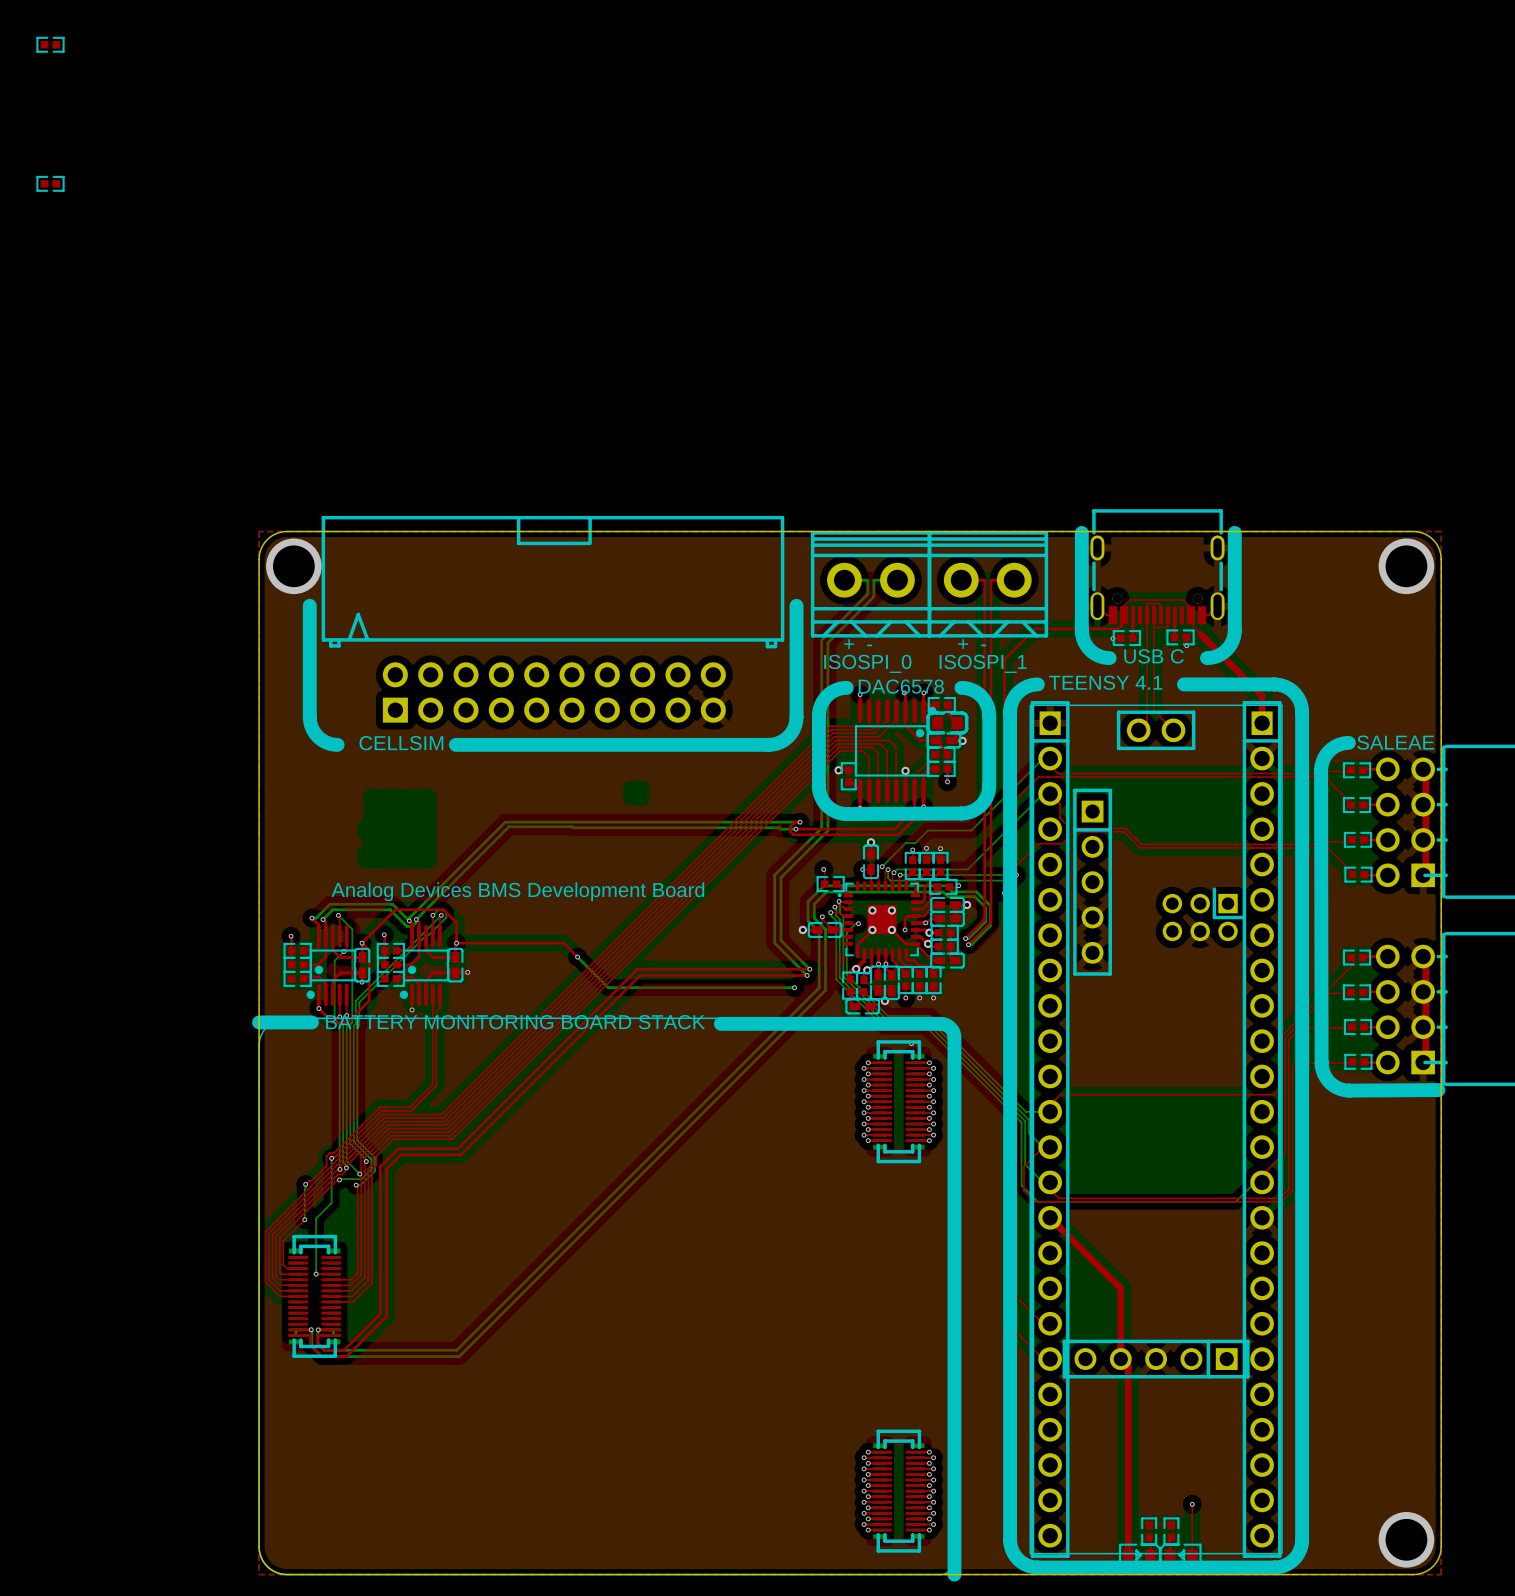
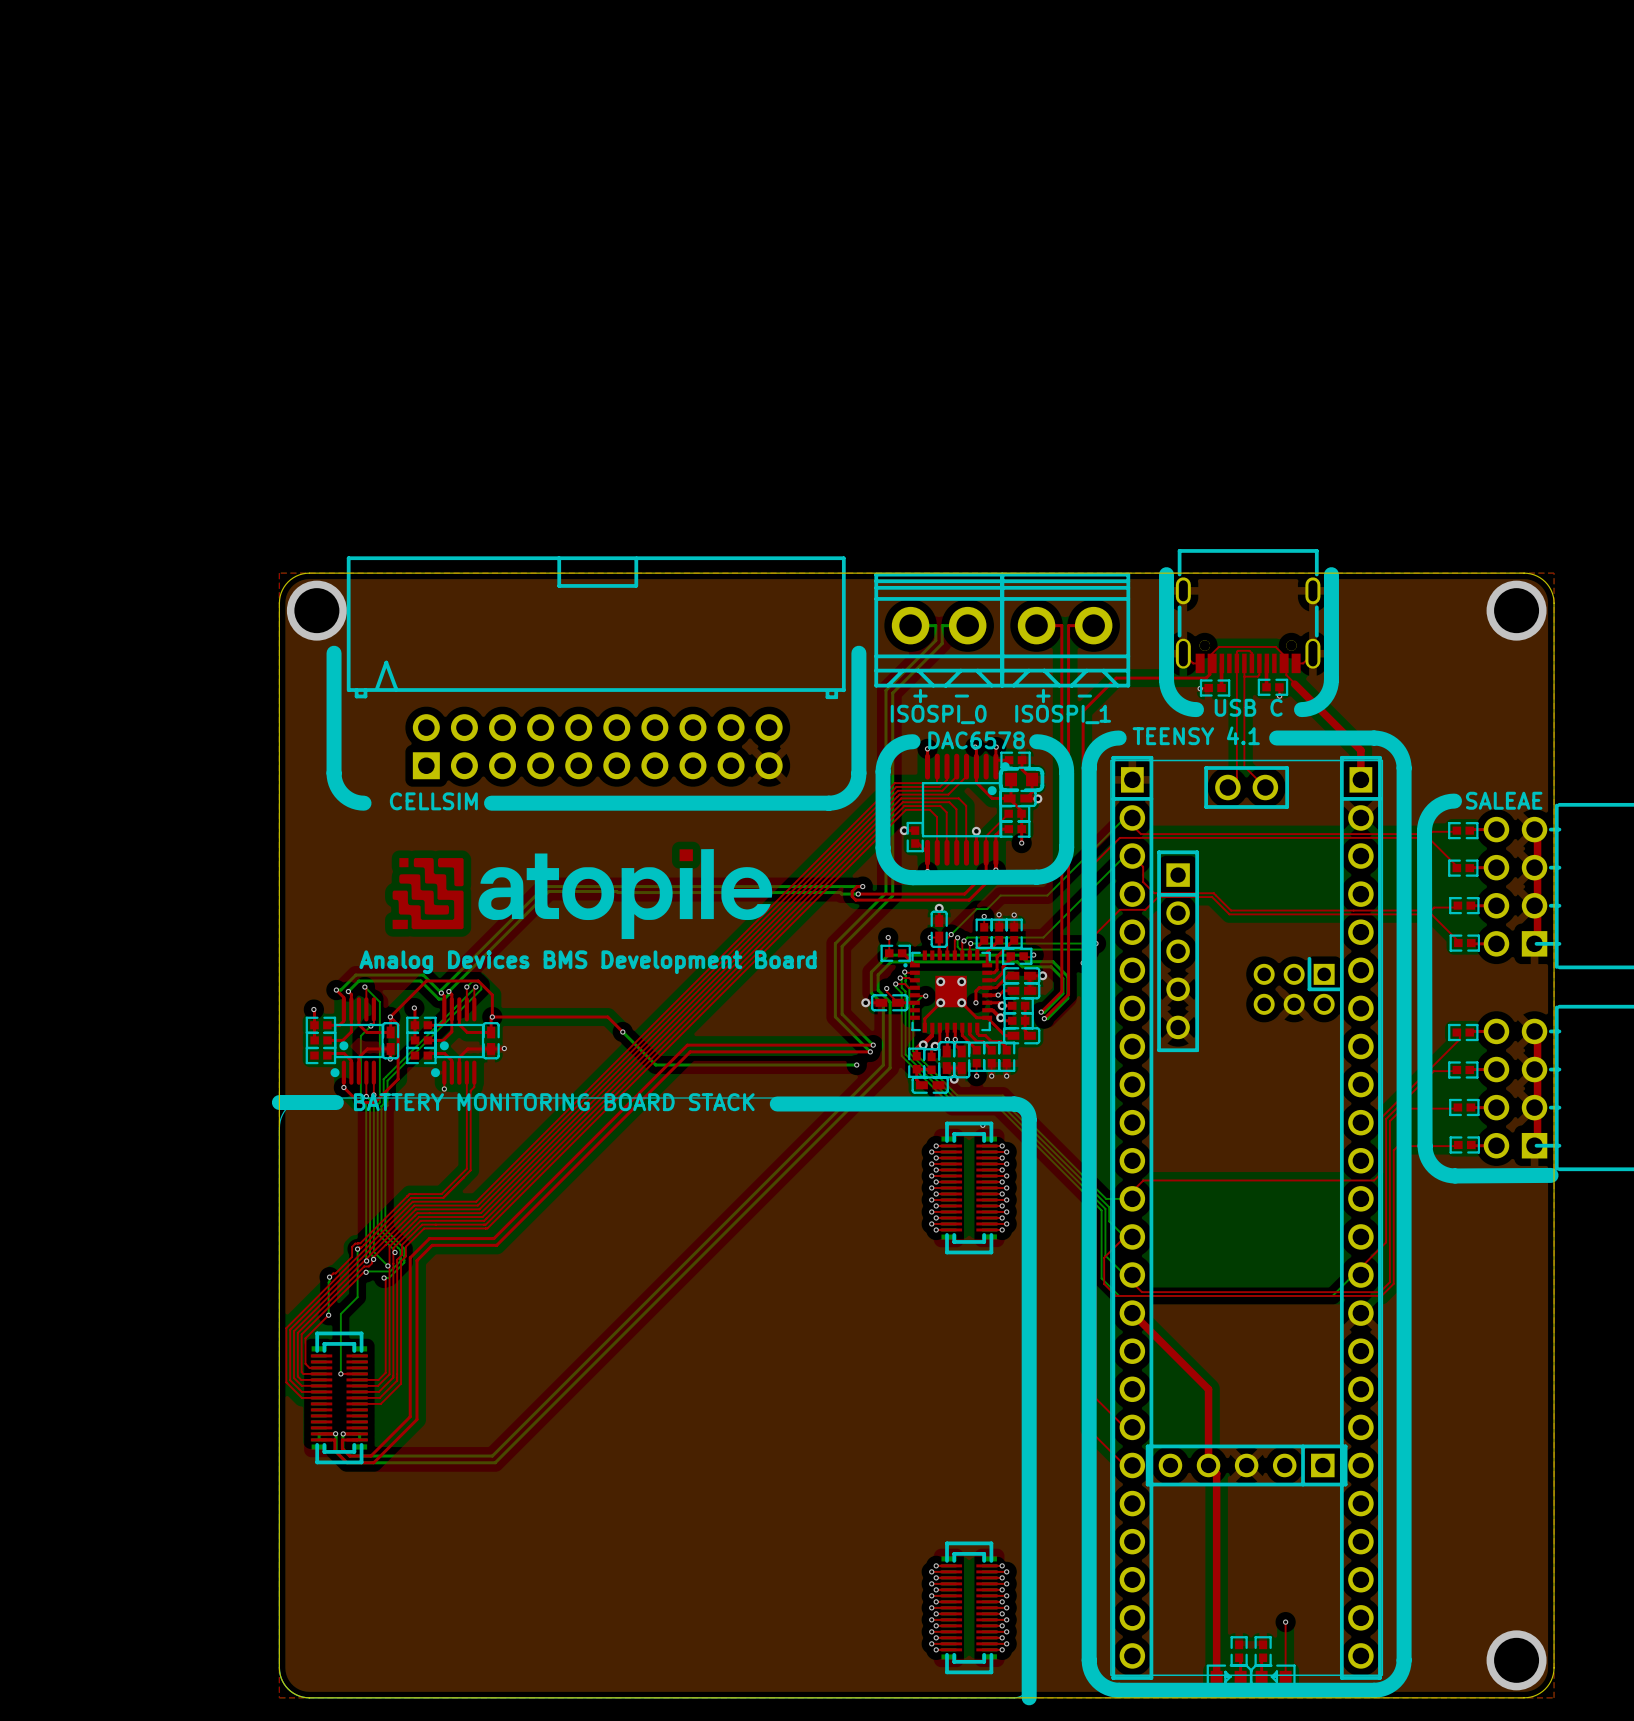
part: (50, 44) -> none
part: (50, 183) -> none
drawing: none -> [392, 849, 773, 940]

